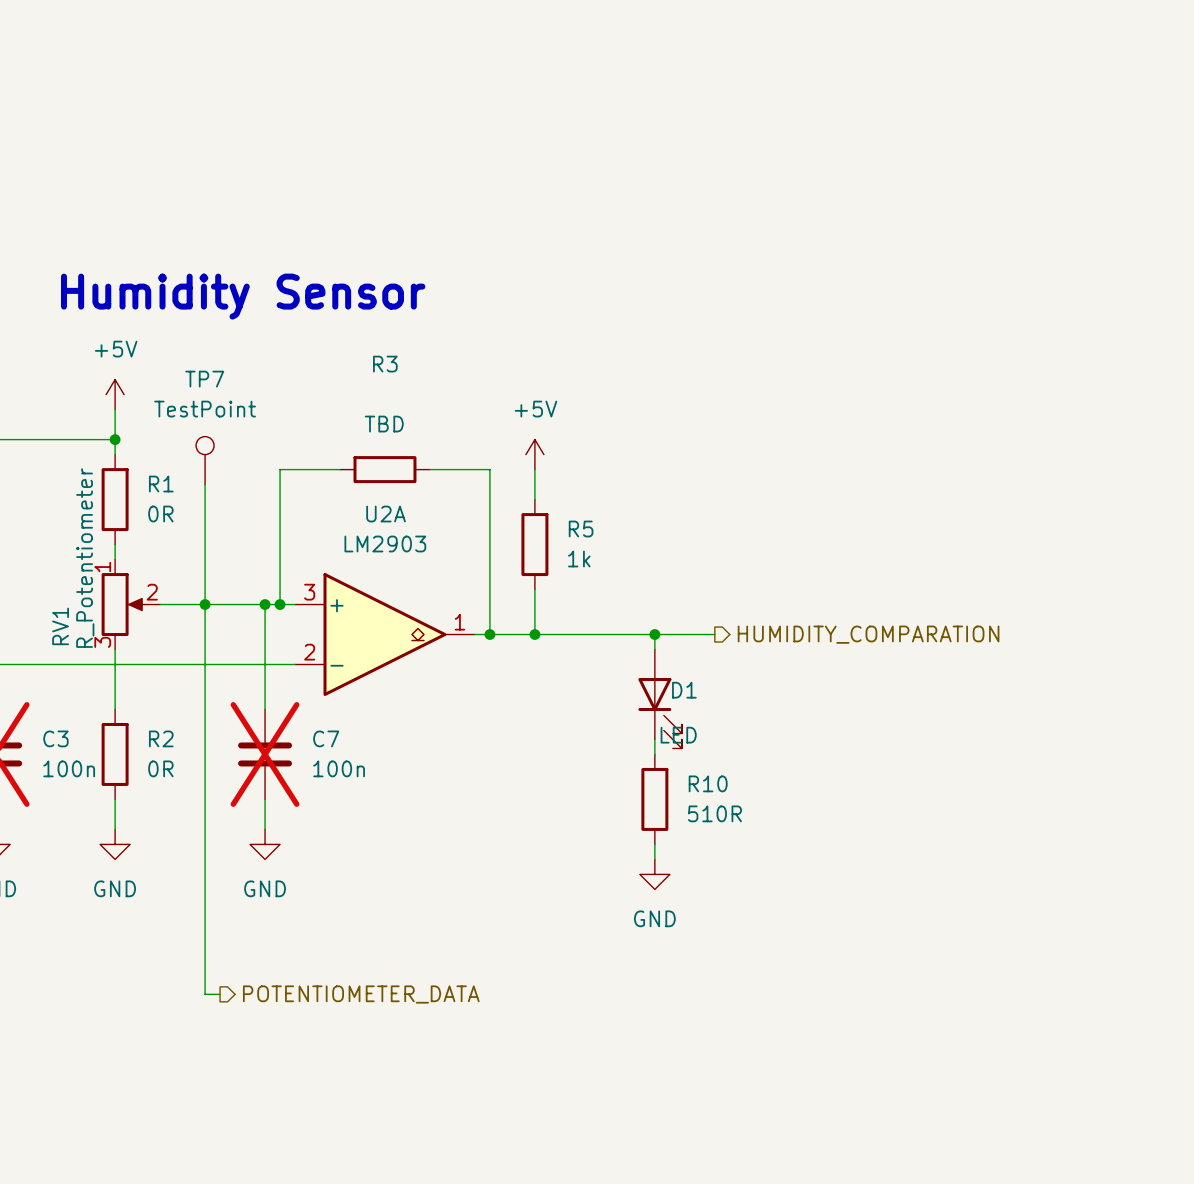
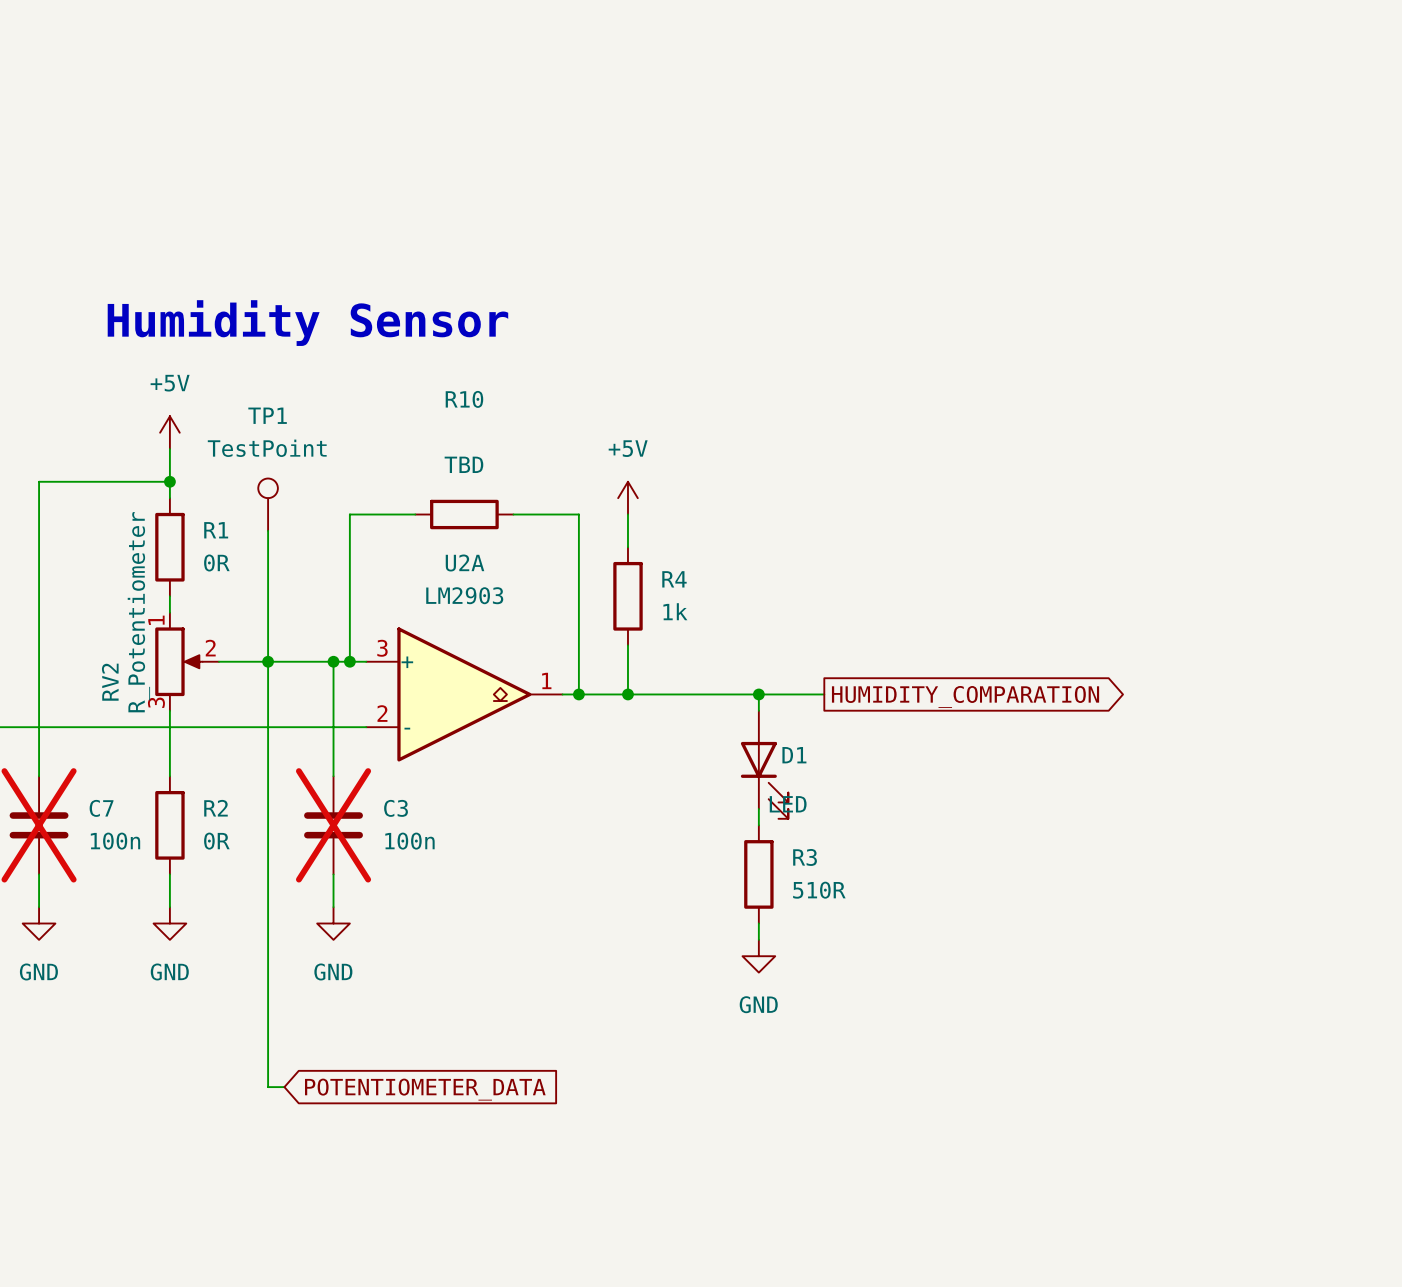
R3 name: R3 (385, 364) -> R10 (464, 399)
TP7 name: TP7 (204, 379) -> TP1 (267, 415)
R5 name: R5 (581, 529) -> R4 (674, 579)
RV1 name: RV1 (60, 626) -> RV2 (110, 682)
hierarchical label: HUMIDITY_COMPARATION (868, 634) -> none
global label: none -> HUMIDITY_COMPARATION (965, 696)
C3 name: C3 (55, 738) -> C7 (101, 808)
C7 name: C7 (326, 738) -> C3 (396, 808)
R10 name: R10 (708, 783) -> R3 (805, 857)
hierarchical label: POTENTIOMETER_DATA (361, 994) -> none
global label: none -> POTENTIOMETER_DATA (425, 1089)

